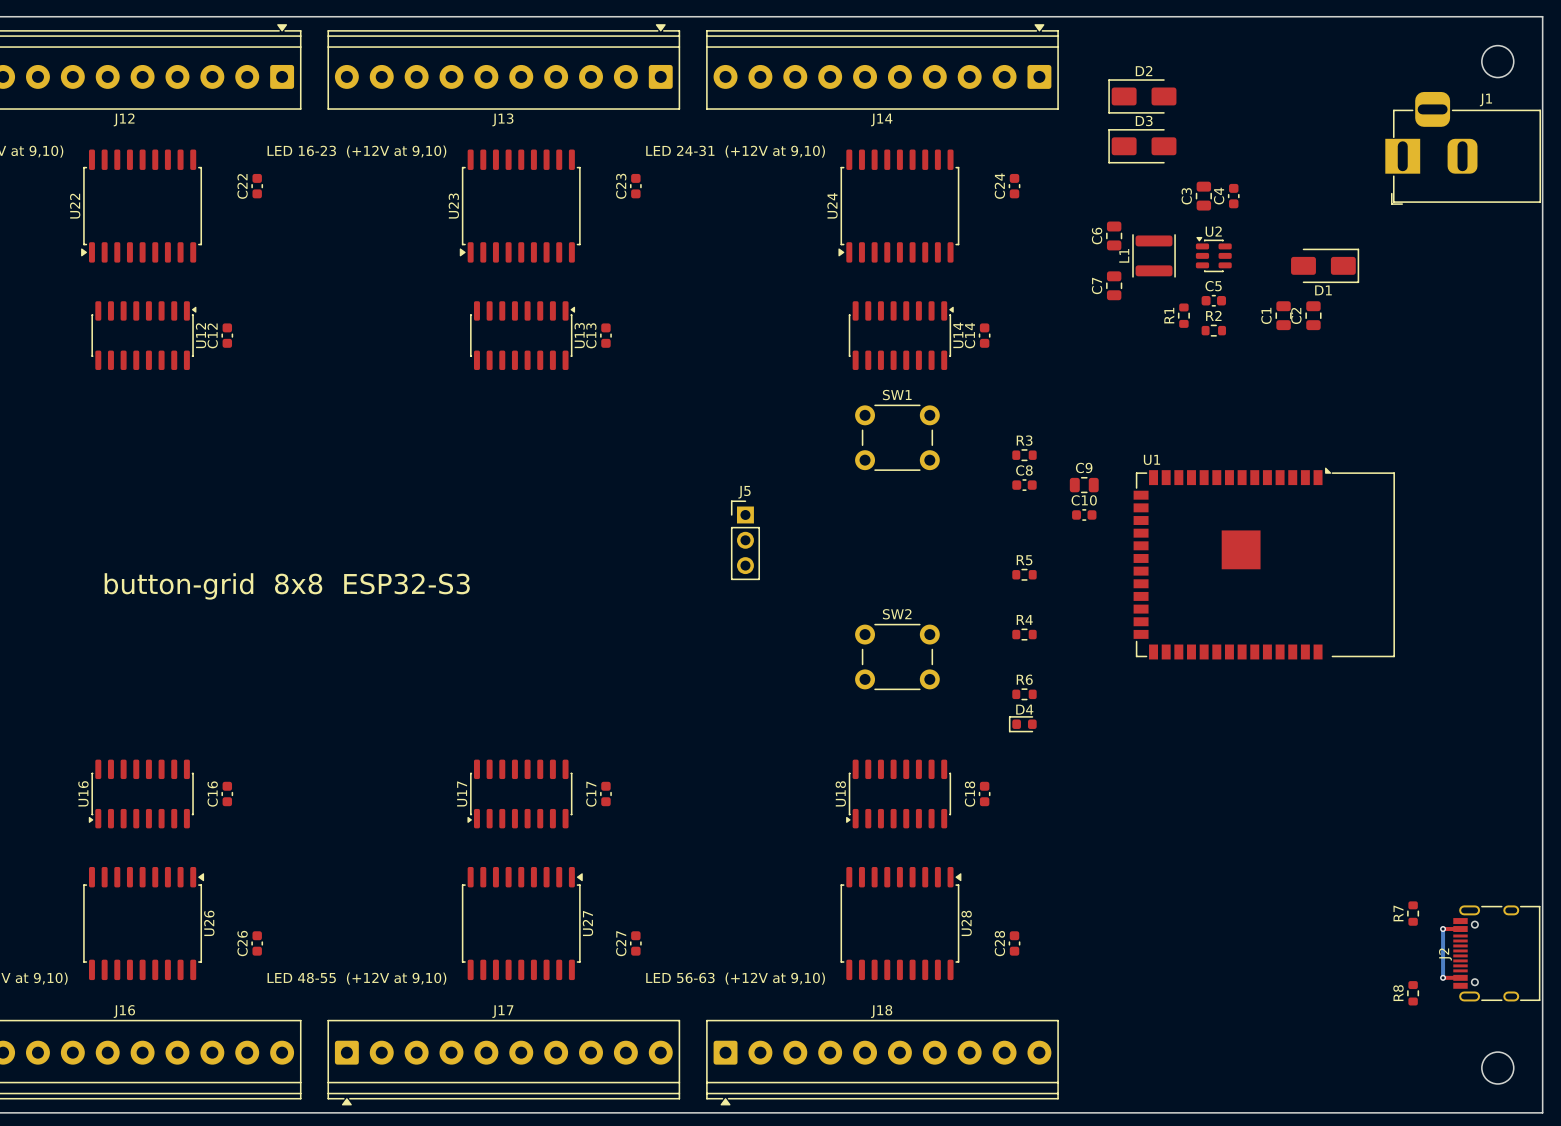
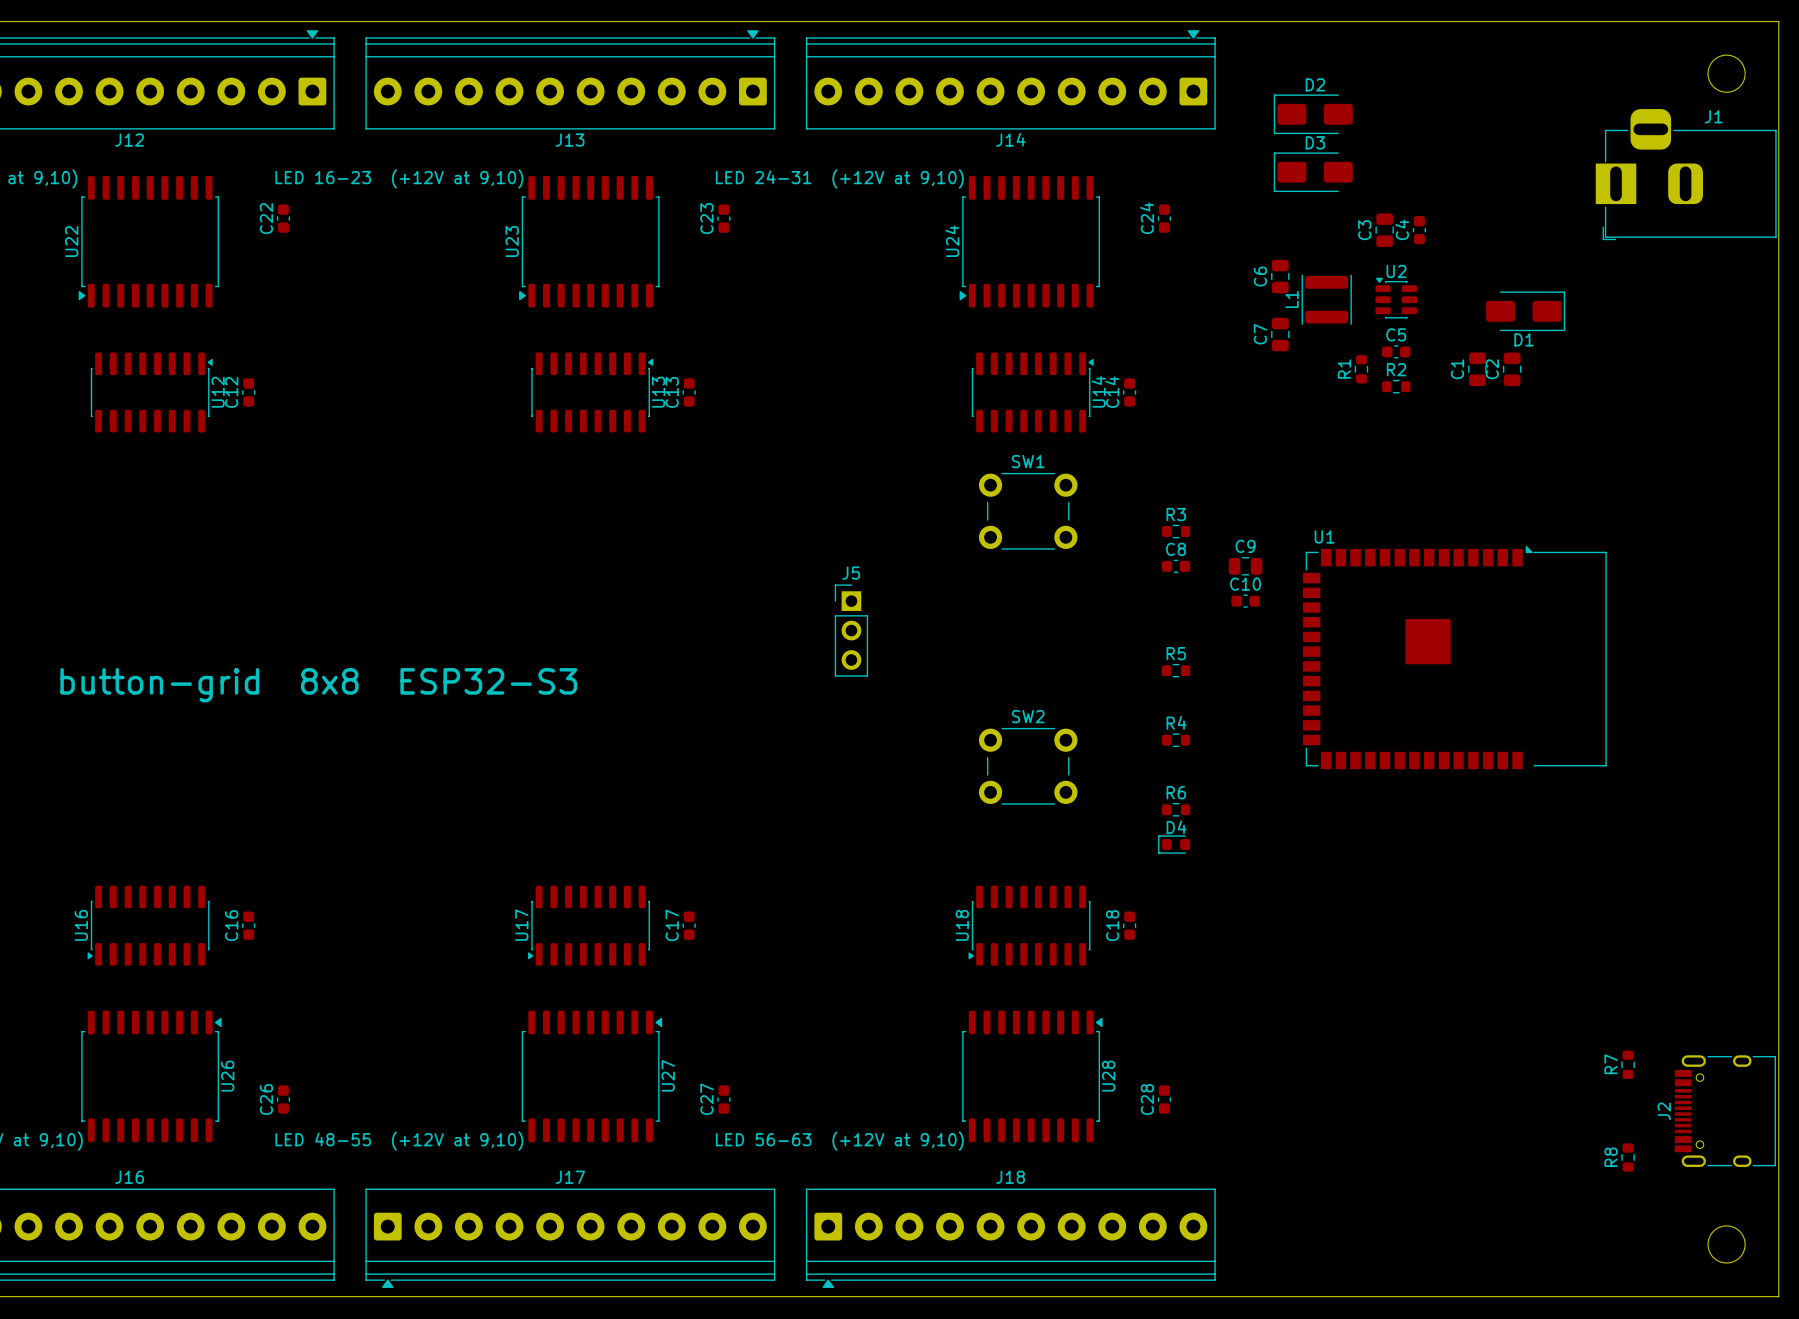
top track: (1443, 929) (1460, 929) -> none
bottom track: (1443, 929) (1443, 977) -> none
via: (1443, 929) -> none
top track: (1443, 977) (1460, 977) -> none
via: (1443, 977) -> none

